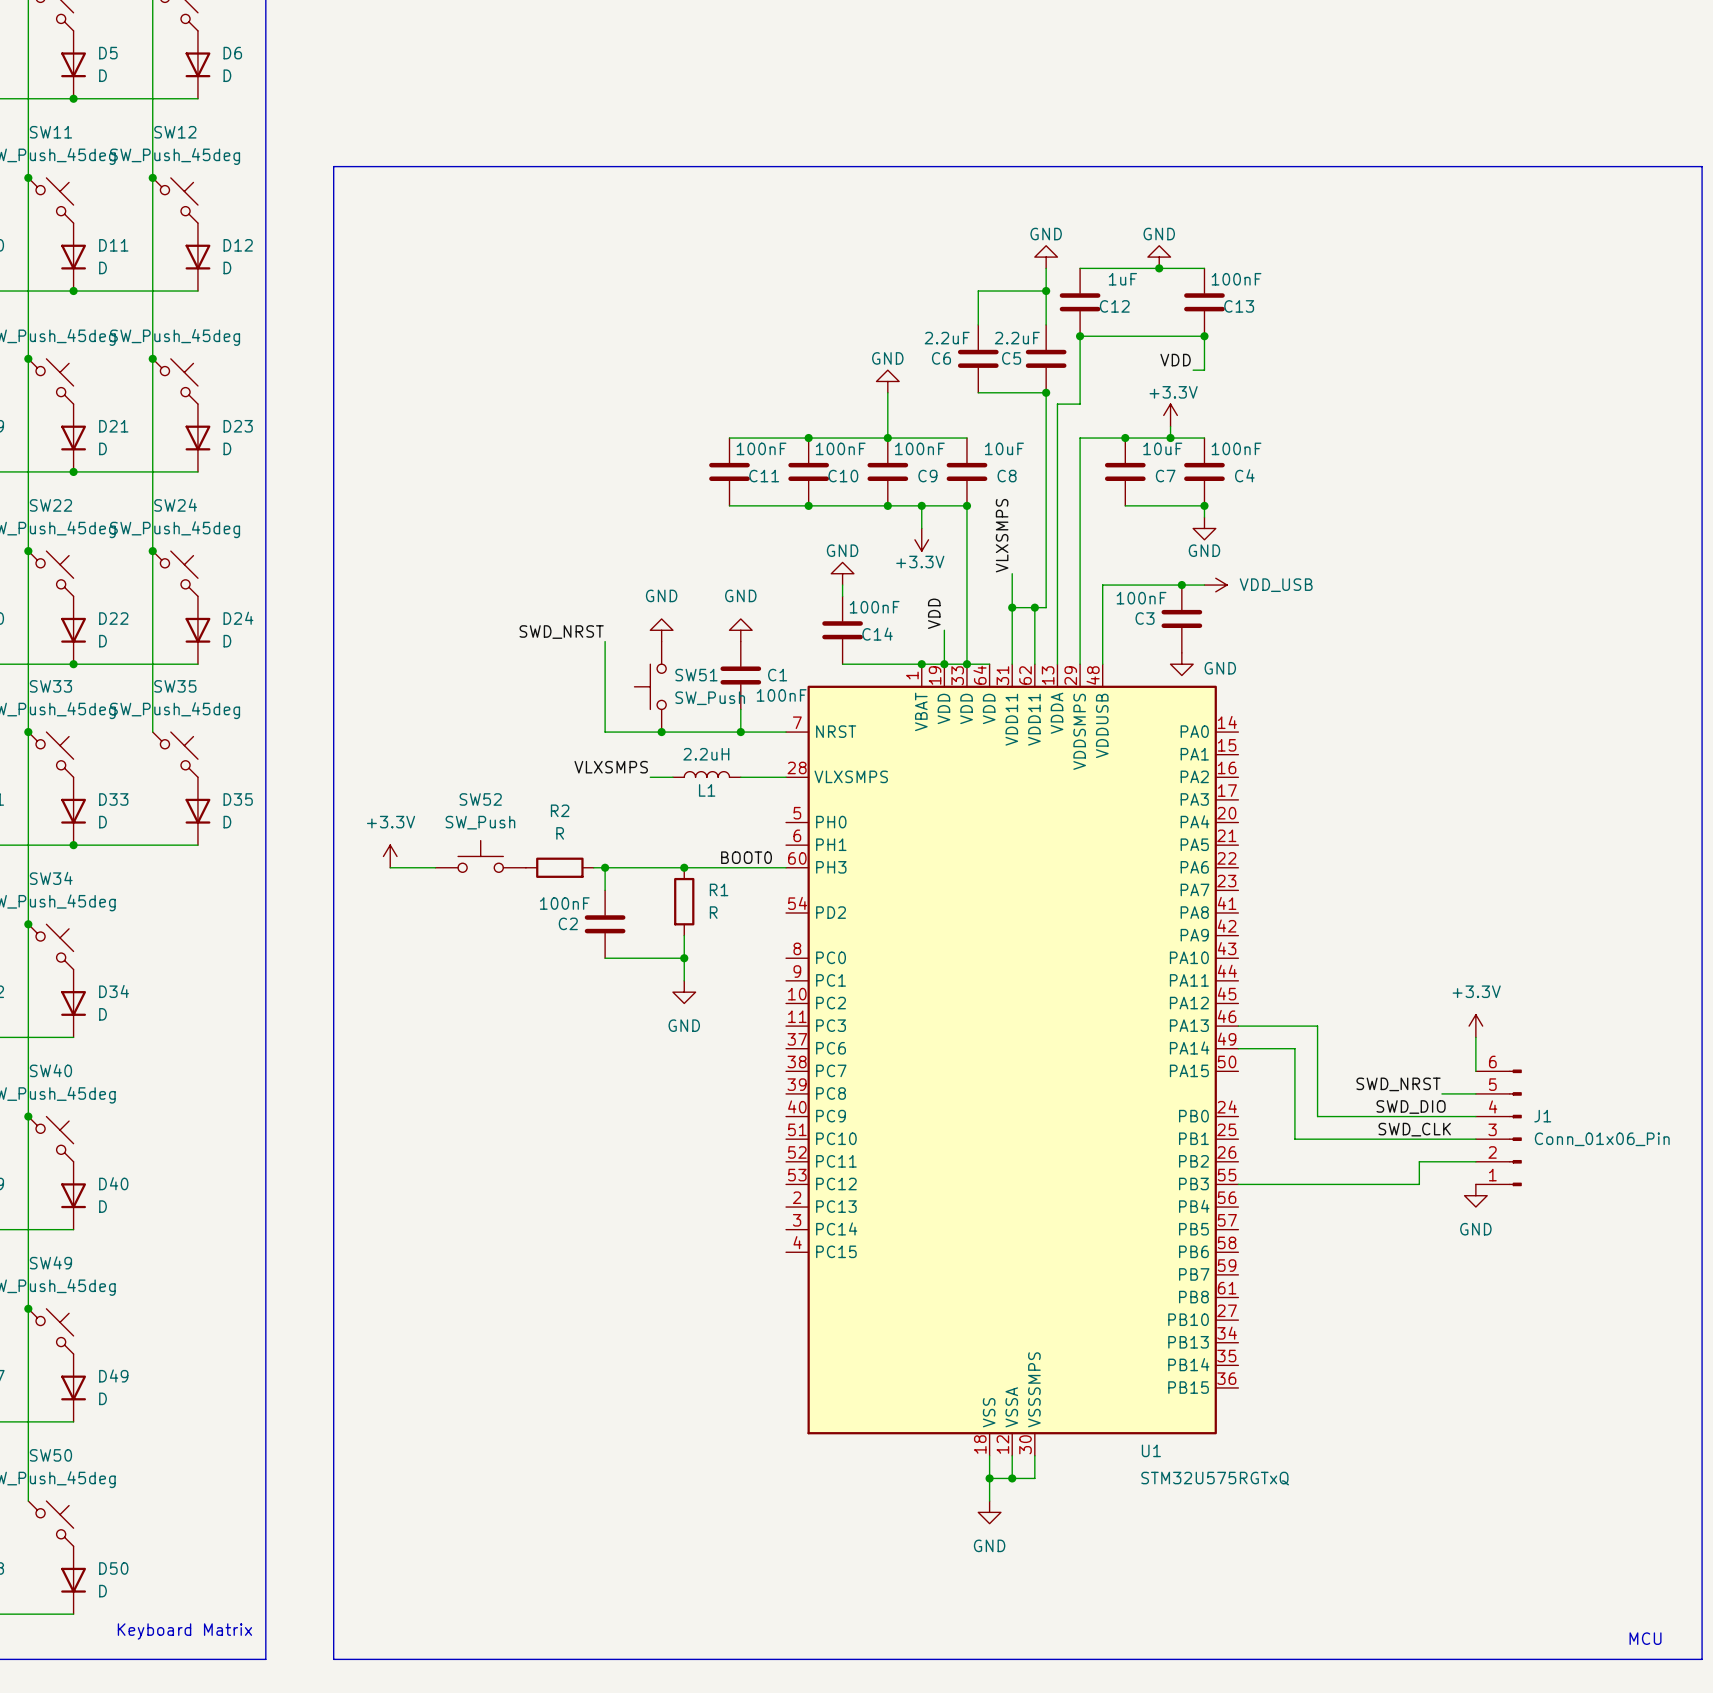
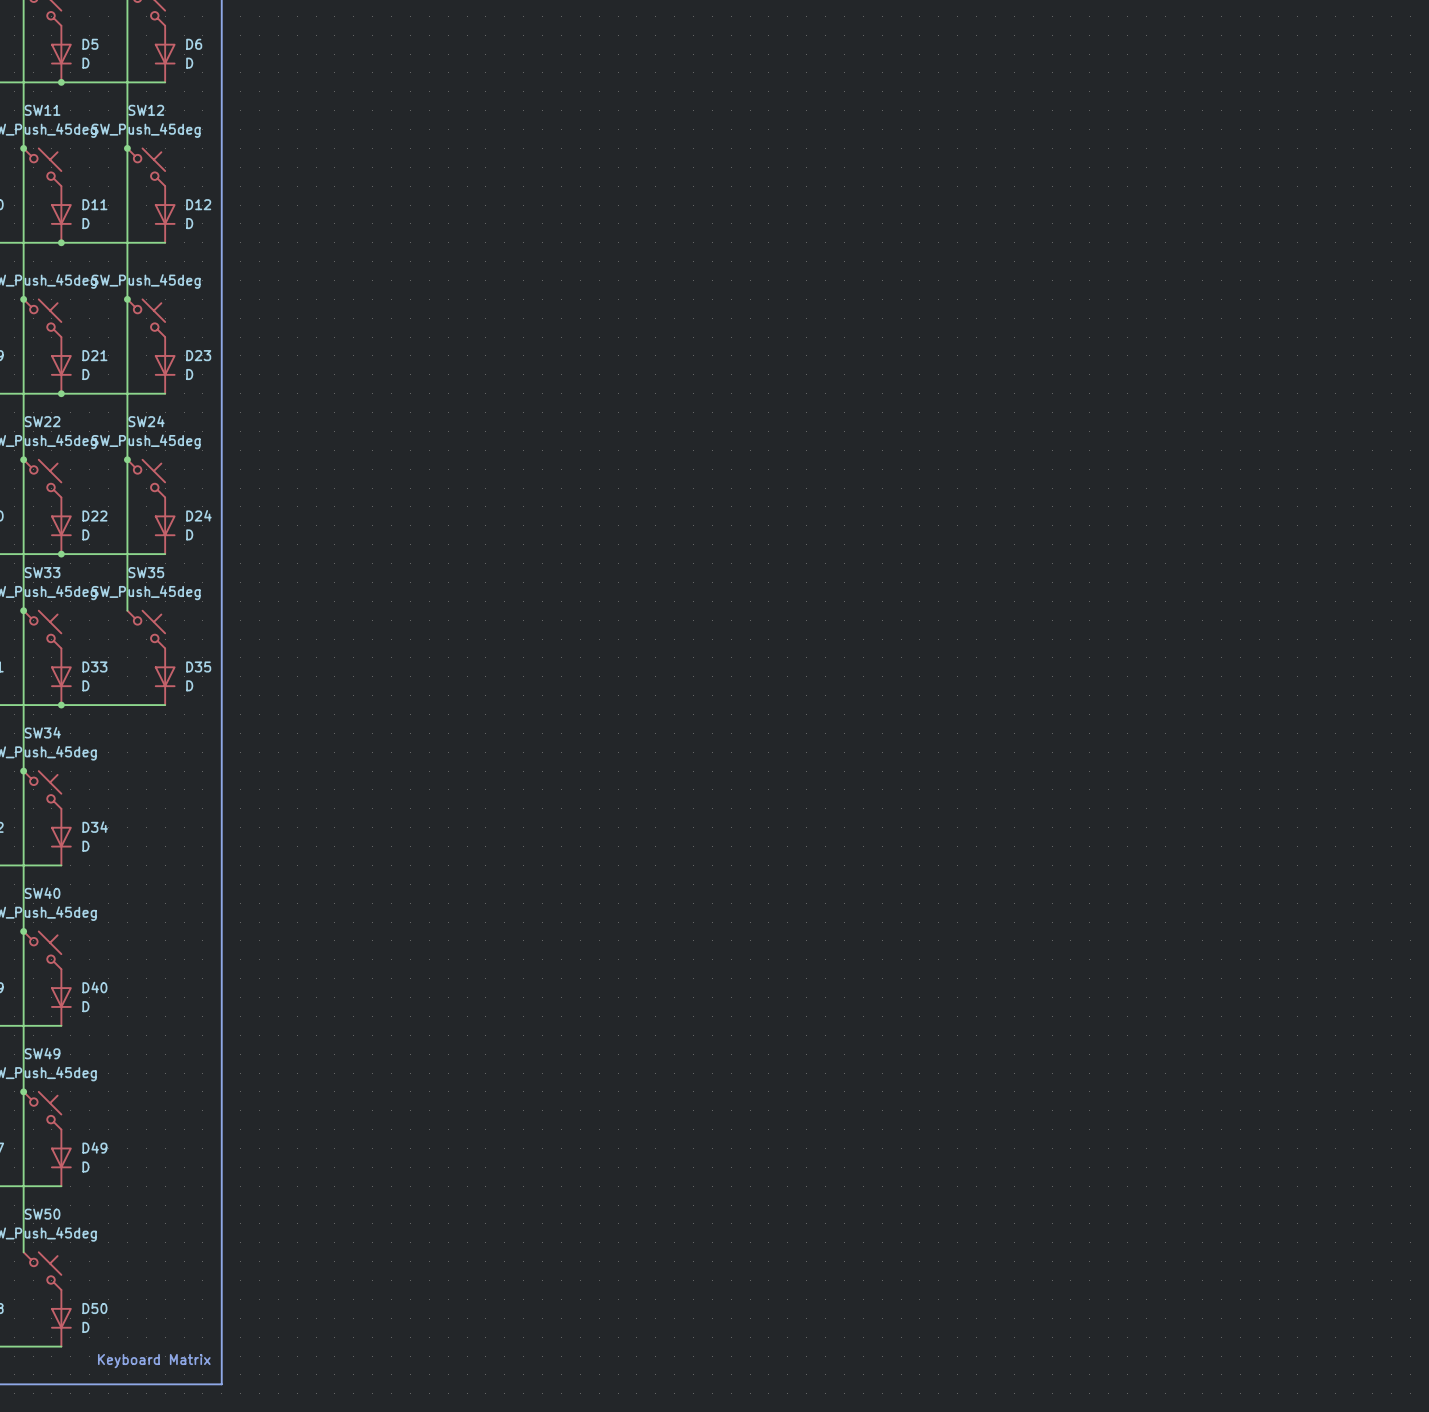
line: (333, 166) (1702, 166) (1702, 1659) (333, 1659) (333, 166) -> none
power symbol: GND (1046, 257) -> none
power symbol: GND (1159, 257) -> none
wire: (1046, 268) (1046, 324) -> none
wire: (1080, 268) (1204, 268) -> none
junction: (1159, 268) -> none
wire: (1046, 291) (978, 291) (978, 324) -> none
junction: (1046, 291) -> none
C12: 1uF (1080, 302) -> none
C13: 100nF (1204, 302) -> none
junction: (1080, 336) -> none
junction: (1204, 336) -> none
C6: 2.2uF (978, 358) -> none
C5: 2.2uF (1046, 358) -> none
label: VDD (1175, 360) -> none
wire: (1193, 370) (1204, 370) (1204, 336) (1080, 336) (1080, 404) (1057, 404) (1057, 664) -> none
power symbol: GND (887, 381) -> none
wire: (887, 392) (887, 438) -> none
wire: (978, 392) (1046, 392) (1046, 607) (1012, 607) -> none
junction: (1046, 392) -> none
power symbol: +3.3V (1170, 415) -> none
wire: (1170, 426) (1170, 438) -> none
wire: (729, 438) (966, 438) -> none
junction: (808, 438) -> none
junction: (887, 438) -> none
junction: (1125, 438) -> none
junction: (1170, 438) -> none
wire: (1204, 438) (1080, 438) (1080, 664) -> none
C11: 100nF (729, 471) -> none
C10: 100nF (808, 471) -> none
C9: 100nF (887, 471) -> none
C8: 10uF (966, 471) -> none
C7: 10uF (1125, 471) -> none
C4: 100nF (1204, 471) -> none
wire: (729, 505) (966, 505) (966, 664) -> none
junction: (808, 505) -> none
junction: (887, 505) -> none
wire: (921, 505) (921, 528) -> none
junction: (921, 505) -> none
junction: (966, 505) -> none
wire: (1125, 505) (1204, 505) (1204, 517) -> none
junction: (1204, 505) -> none
power symbol: GND (1204, 528) -> none
label: VLXSMPS (1002, 535) -> none
power symbol: +3.3V (921, 539) -> none
power symbol: GND (842, 573) -> none
wire: (1012, 573) (1012, 664) -> none
wire: (842, 585) (842, 596) -> none
junction: (1181, 585) -> none
wire: (1204, 585) (1102, 585) (1102, 664) -> none
power symbol: VDD_USB (1215, 585) -> none
junction: (1012, 607) -> none
wire: (1034, 607) (1034, 664) -> none
junction: (1034, 607) -> none
label: VDD (934, 613) -> none
C3: 100nF (1181, 618) -> none
power symbol: GND (661, 630) -> none
power symbol: GND (740, 630) -> none
C14: 100nF (842, 630) -> none
wire: (944, 630) (944, 664) -> none
label: SWD_NRST (561, 632) -> none
wire: (605, 641) (605, 732) (786, 732) -> none
wire: (842, 664) (989, 664) -> none
junction: (921, 664) -> none
junction: (944, 664) -> none
junction: (966, 664) -> none
power symbol: GND (1181, 664) -> none
C1: 100nF (740, 675) -> none
SW51: SW_Push (650, 686) -> none
wire: (740, 709) (740, 732) -> none
junction: (661, 732) -> none
junction: (740, 732) -> none
label: VLXSMPS (611, 767) -> none
L1: 2.2uH (706, 774) -> none
wire: (650, 777) (672, 777) -> none
wire: (740, 777) (786, 777) -> none
power symbol: +3.3V (390, 856) -> none
SW52: SW_Push (480, 856) -> none
label: BOOT0 (746, 857) -> none
wire: (390, 867) (435, 867) -> none
R2: R (559, 867) -> none
wire: (593, 867) (786, 867) -> none
wire: (605, 867) (605, 890) -> none
junction: (605, 867) -> none
junction: (684, 867) -> none
R1: R (684, 901) -> none
C2: 100nF (605, 924) -> none
wire: (684, 935) (684, 980) -> none
wire: (605, 958) (684, 958) -> none
junction: (684, 958) -> none
power symbol: GND (684, 992) -> none
wire: (1238, 1026) (1317, 1026) (1317, 1116) (1475, 1116) -> none
power symbol: +3.3V (1475, 1026) -> none
wire: (1475, 1037) (1475, 1071) -> none
wire: (1238, 1048) (1294, 1048) (1294, 1139) (1475, 1139) -> none
U1: STM32U575RGTxQ (1012, 1060) -> none
label: SWD_NRST (1398, 1084) -> none
wire: (1441, 1093) (1475, 1093) -> none
label: SWD_DIO (1411, 1107) -> none
J1: Conn_01x06_Pin (1498, 1127) -> none
label: SWD_CLK (1414, 1129) -> none
wire: (1475, 1161) (1419, 1161) (1419, 1184) (1238, 1184) -> none
power symbol: GND (1475, 1195) -> none
wire: (989, 1455) (989, 1501) -> none
wire: (1012, 1455) (1012, 1478) -> none
wire: (1034, 1455) (1034, 1478) (989, 1478) -> none
junction: (989, 1478) -> none
junction: (1012, 1478) -> none
power symbol: GND (989, 1512) -> none
text: MCU (1645, 1638) -> none

